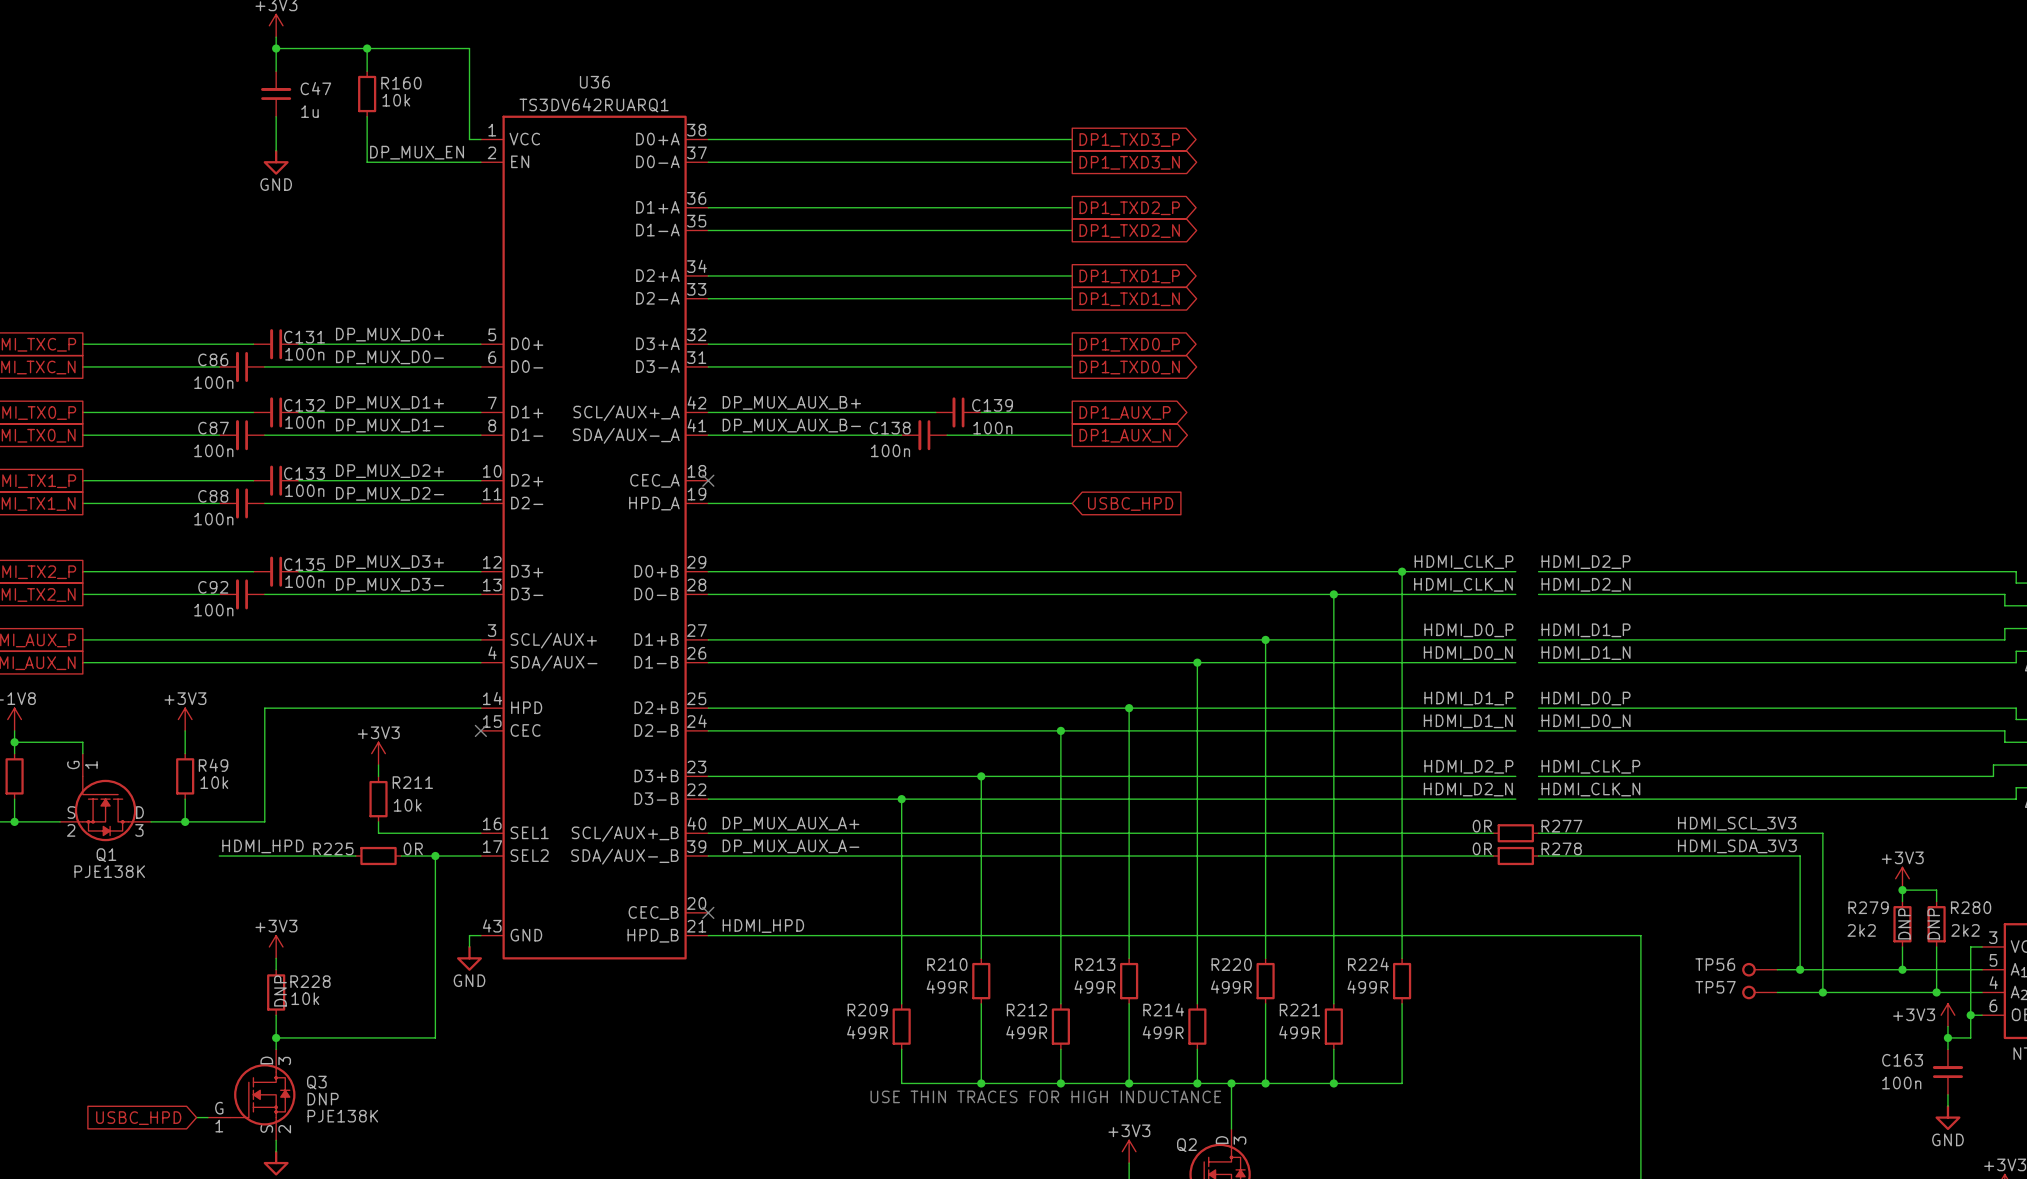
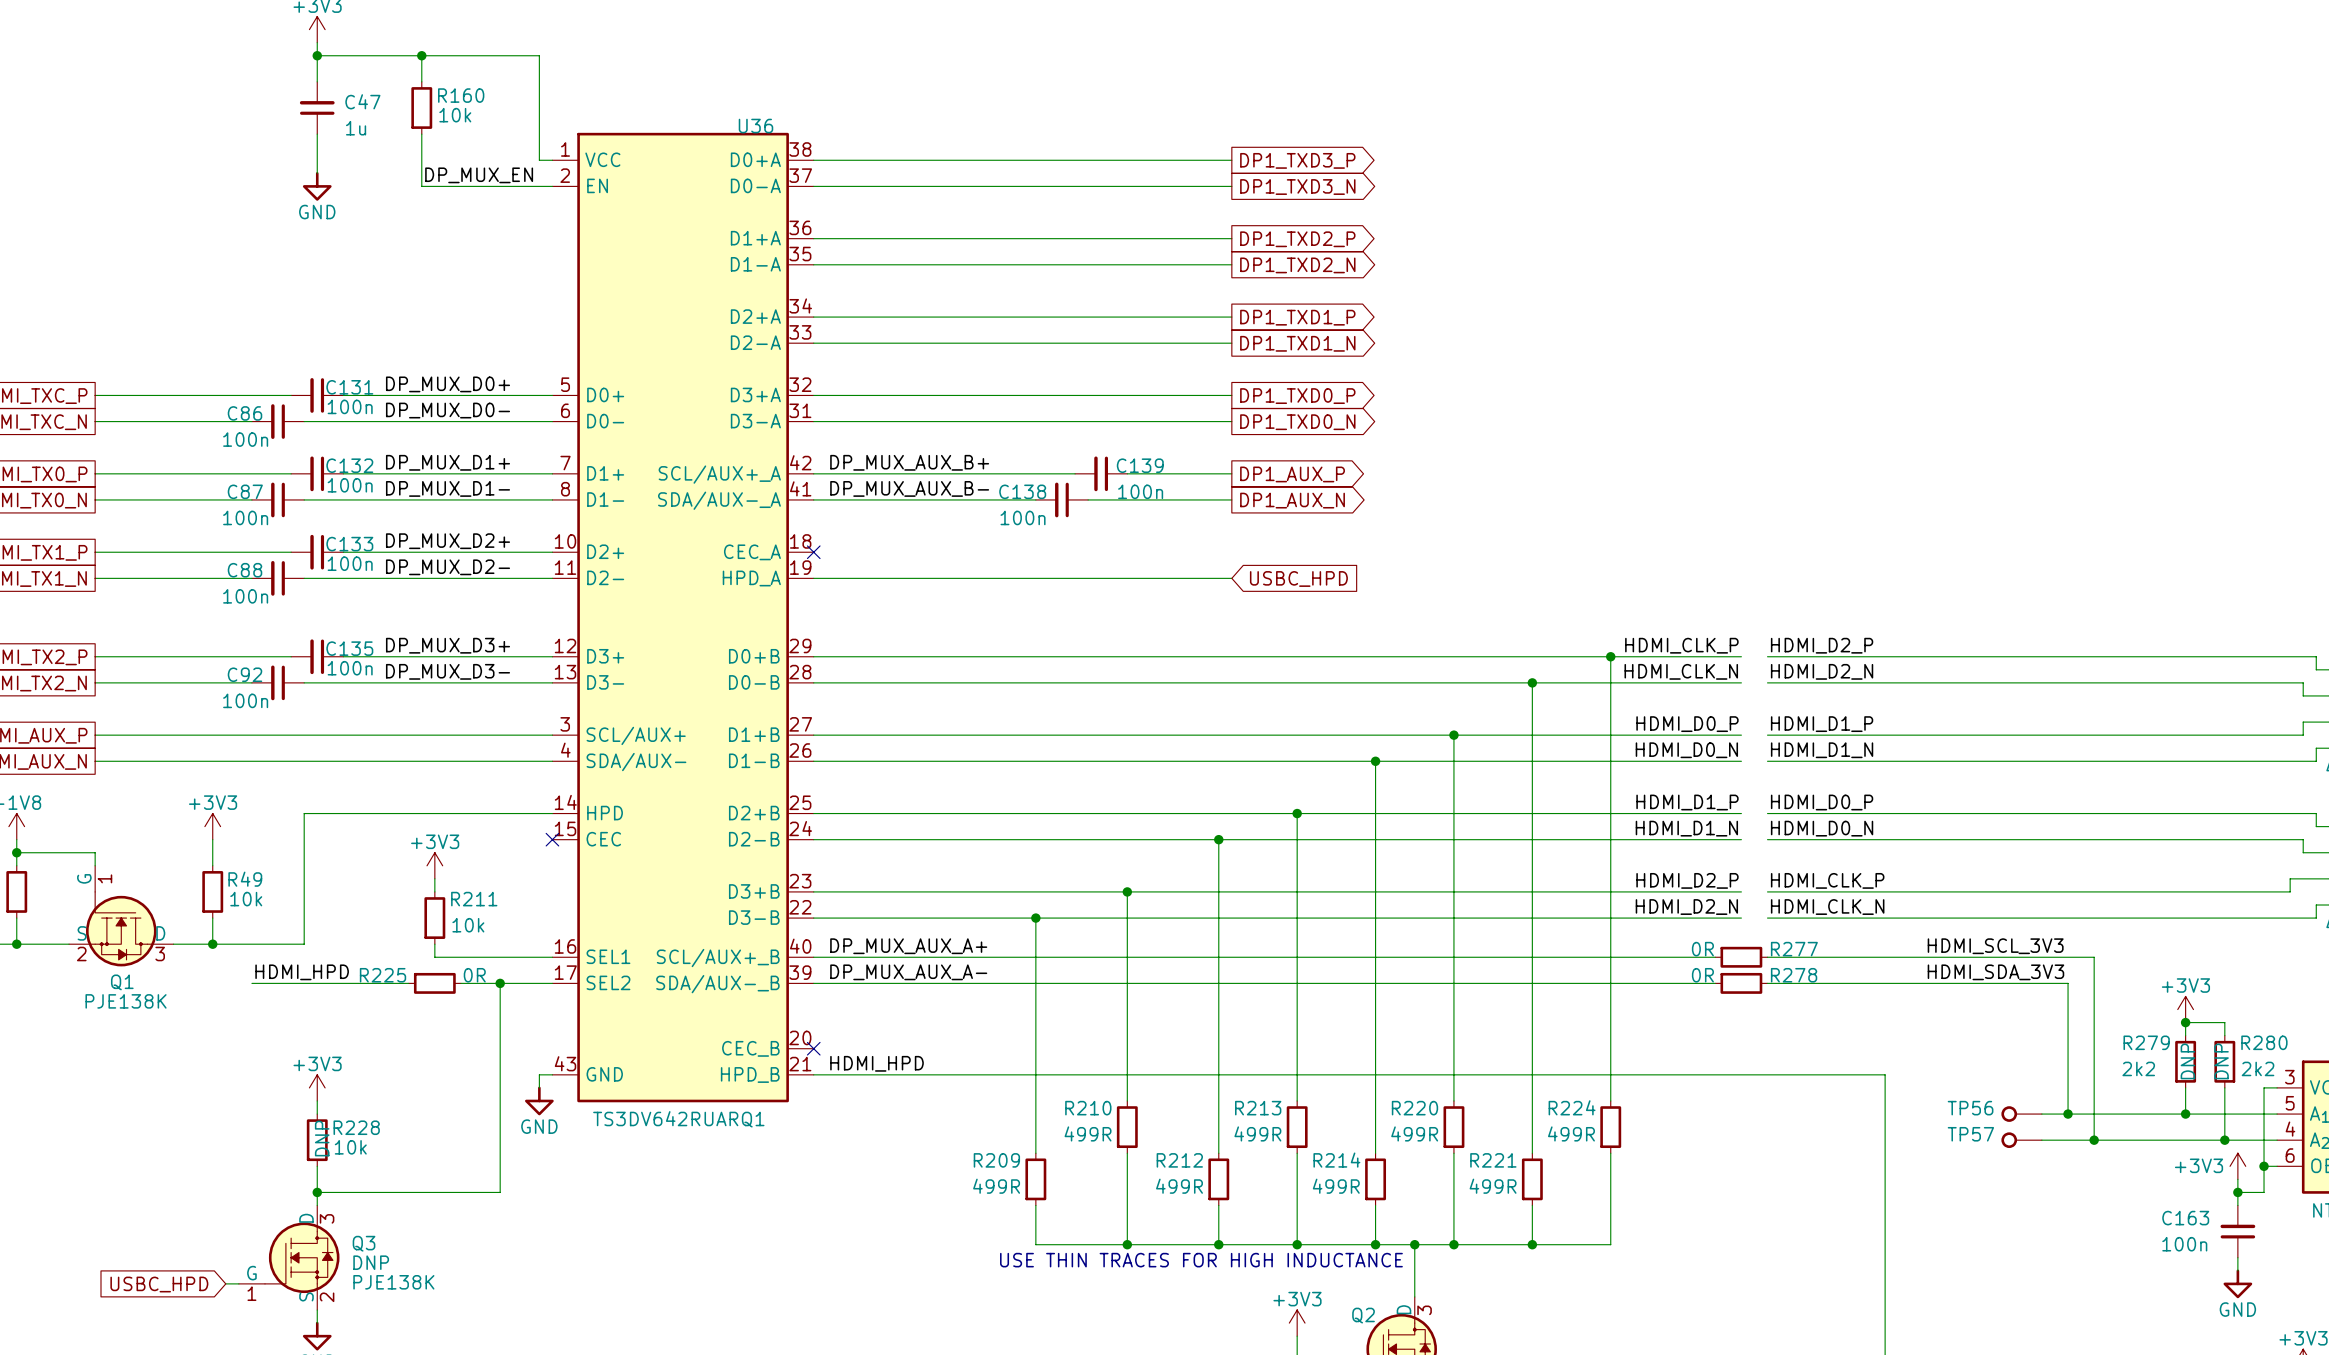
U36 name position: U36 (594, 82) -> U36 (755, 126)
U36 value position: TS3DV642RUARQ1 (594, 105) -> TS3DV642RUARQ1 (678, 1119)

